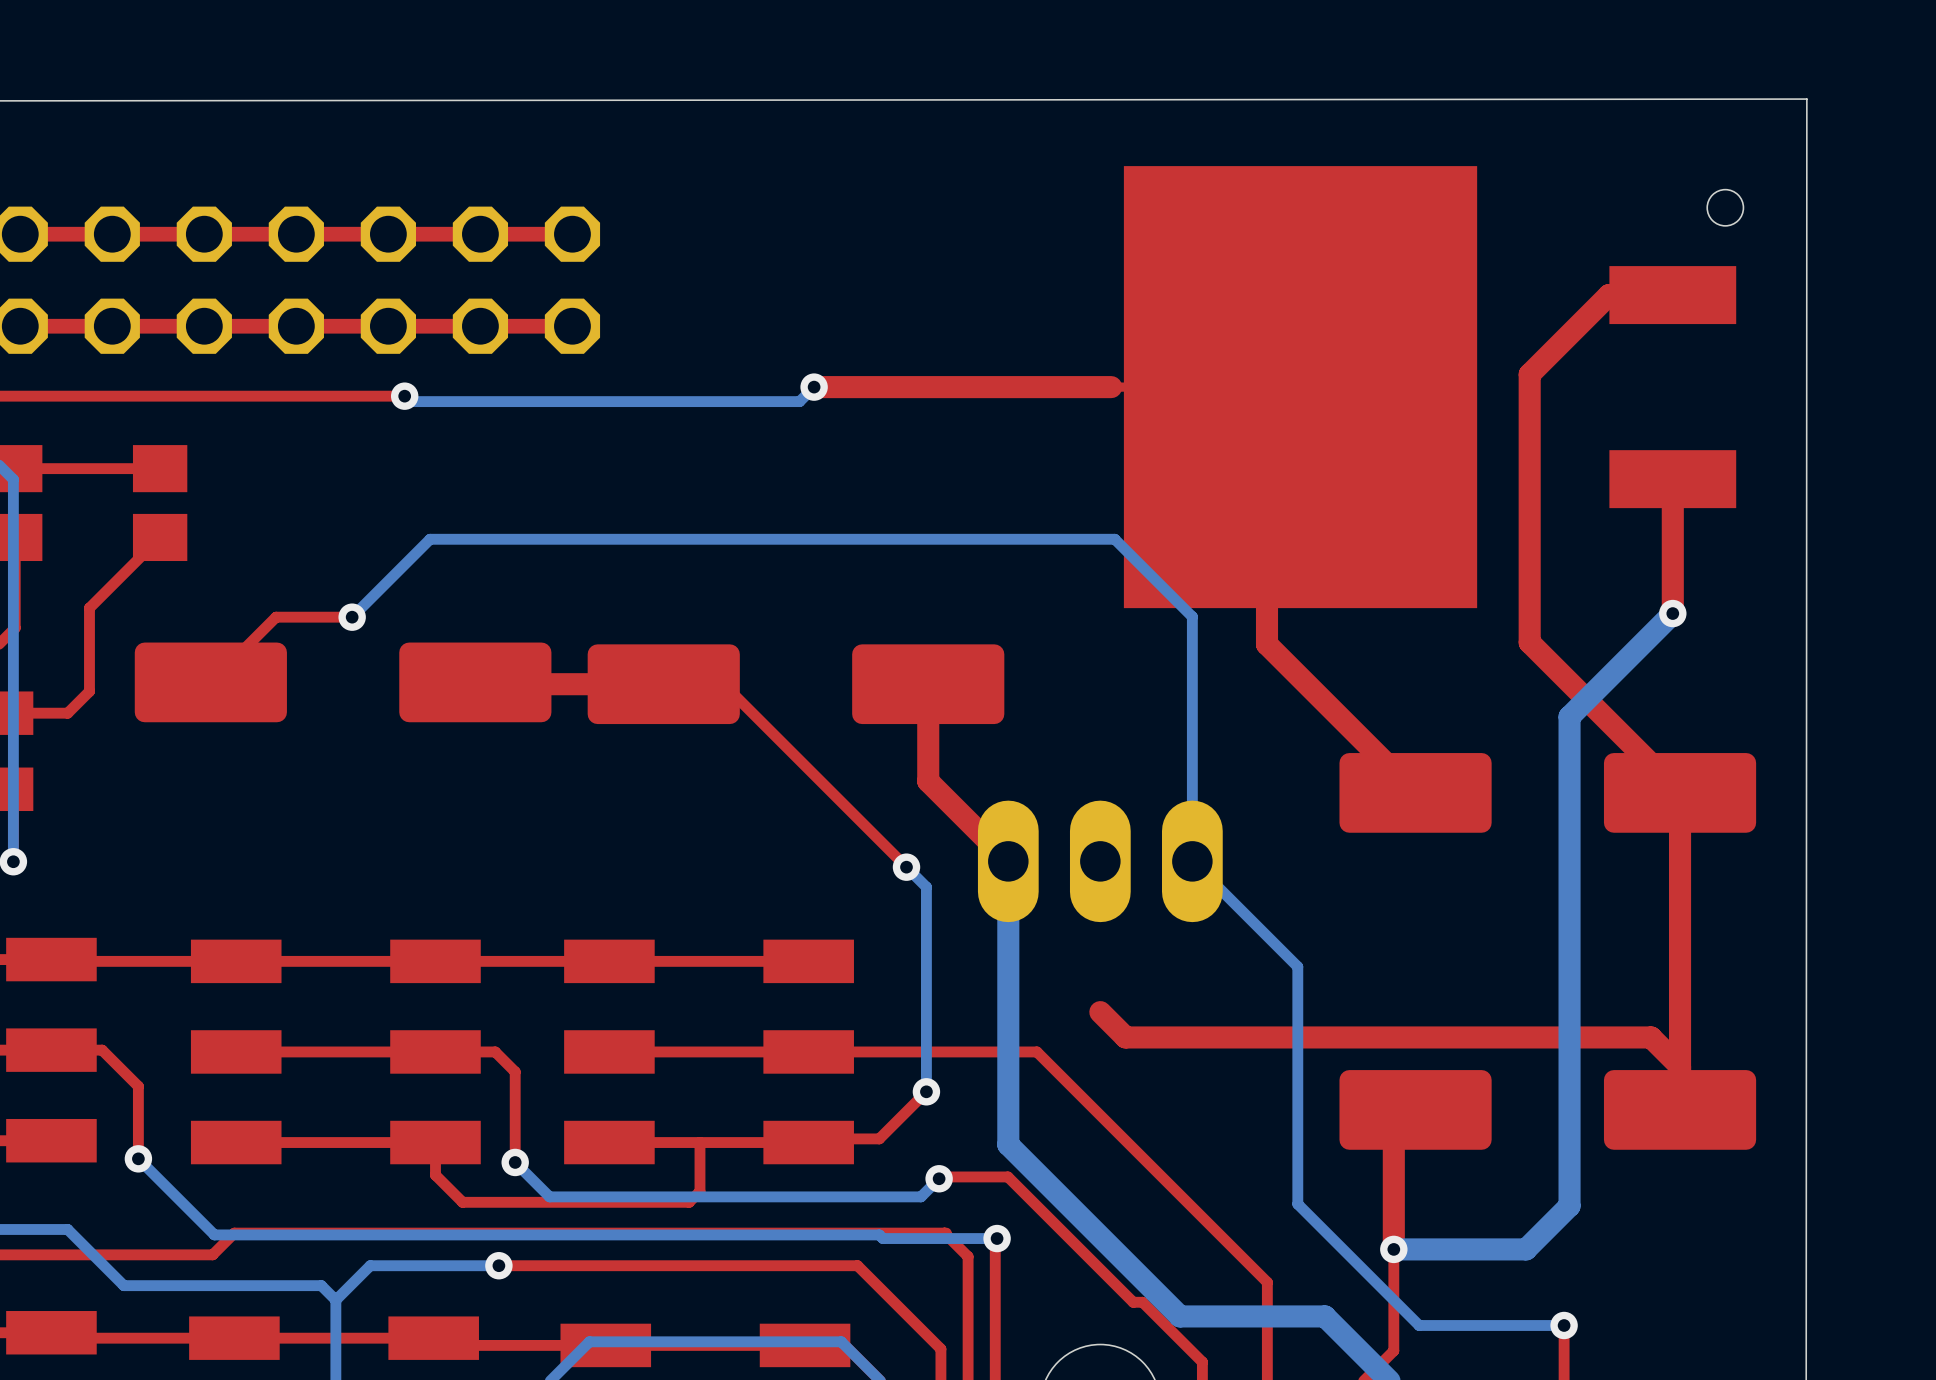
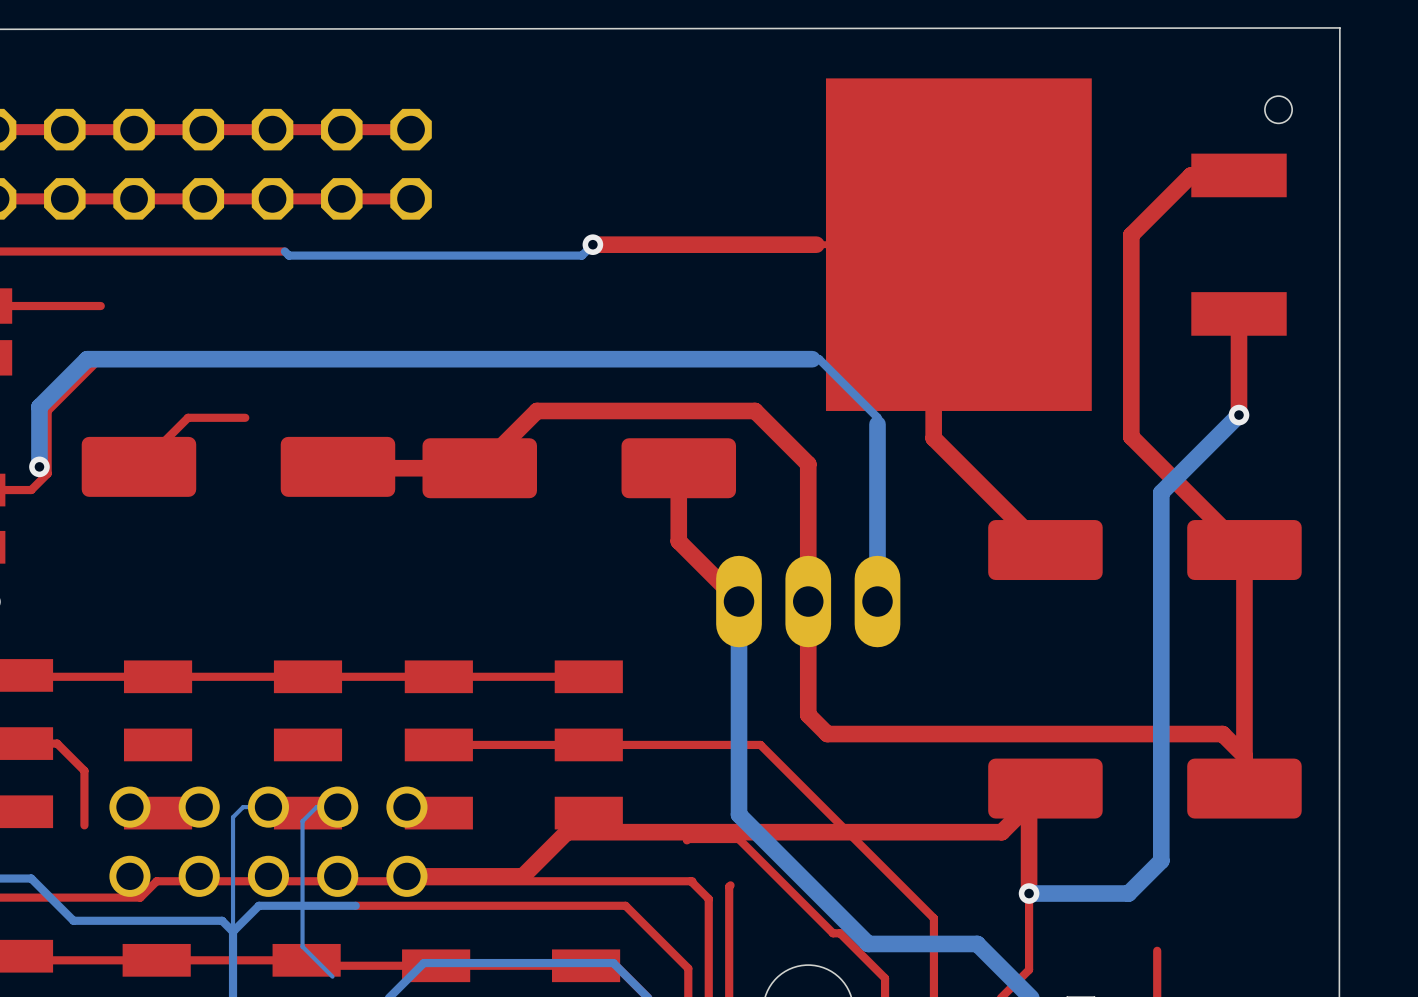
via: (404, 396) -> none
part: (160, 503) -> none
bottom track: (430, 539) (352, 617) -> (303, 359) (87, 359) (39, 406) (39, 466)
bottom track width: thin (1105, 539) (430, 539) -> thick (812, 359) (303, 359)
via: (352, 617) -> none
bottom track width: thin (1192, 625) (1192, 861) -> thick (877, 424) (877, 601)
via: none -> (39, 466)
top track: (663, 684) (723, 684) (906, 867) -> (479, 468) (537, 410) (755, 410) (808, 464) (808, 714)
bottom track: (1192, 861) (1297, 966) (1297, 1204) (1419, 1325) (1564, 1325) -> none
bottom track: (906, 867) (926, 887) (926, 1091) -> none
via: (906, 867) -> none
top track: (236, 1051) (495, 1051) (515, 1071) (515, 1162) -> none
top track: (926, 1091) (879, 1138) (812, 1138) (808, 1142) (609, 1142) -> none
via: (926, 1091) -> none
top track: none -> (1029, 804) (1001, 832) (566, 832) (522, 876) (411, 876)
bottom track: none -> (268, 807) (243, 807) (233, 817) (233, 931)
bottom track: none -> (337, 807) (316, 807) (302, 821) (302, 946) (332, 976)
top track: (699, 1142) (699, 1191) (689, 1202) (462, 1202) (435, 1175) (435, 1142) (236, 1142) -> none
bottom track: (138, 1158) (214, 1234) (879, 1234) (882, 1238) (997, 1238) -> none
via: (138, 1158) -> none
bottom track: (515, 1162) (549, 1196) (920, 1196) (939, 1178) -> none
via: (515, 1162) -> none
via: (939, 1178) -> none
part: none -> (268, 841)
via: (997, 1238) -> none
via: (498, 1265) -> none
via: (1564, 1325) -> none

